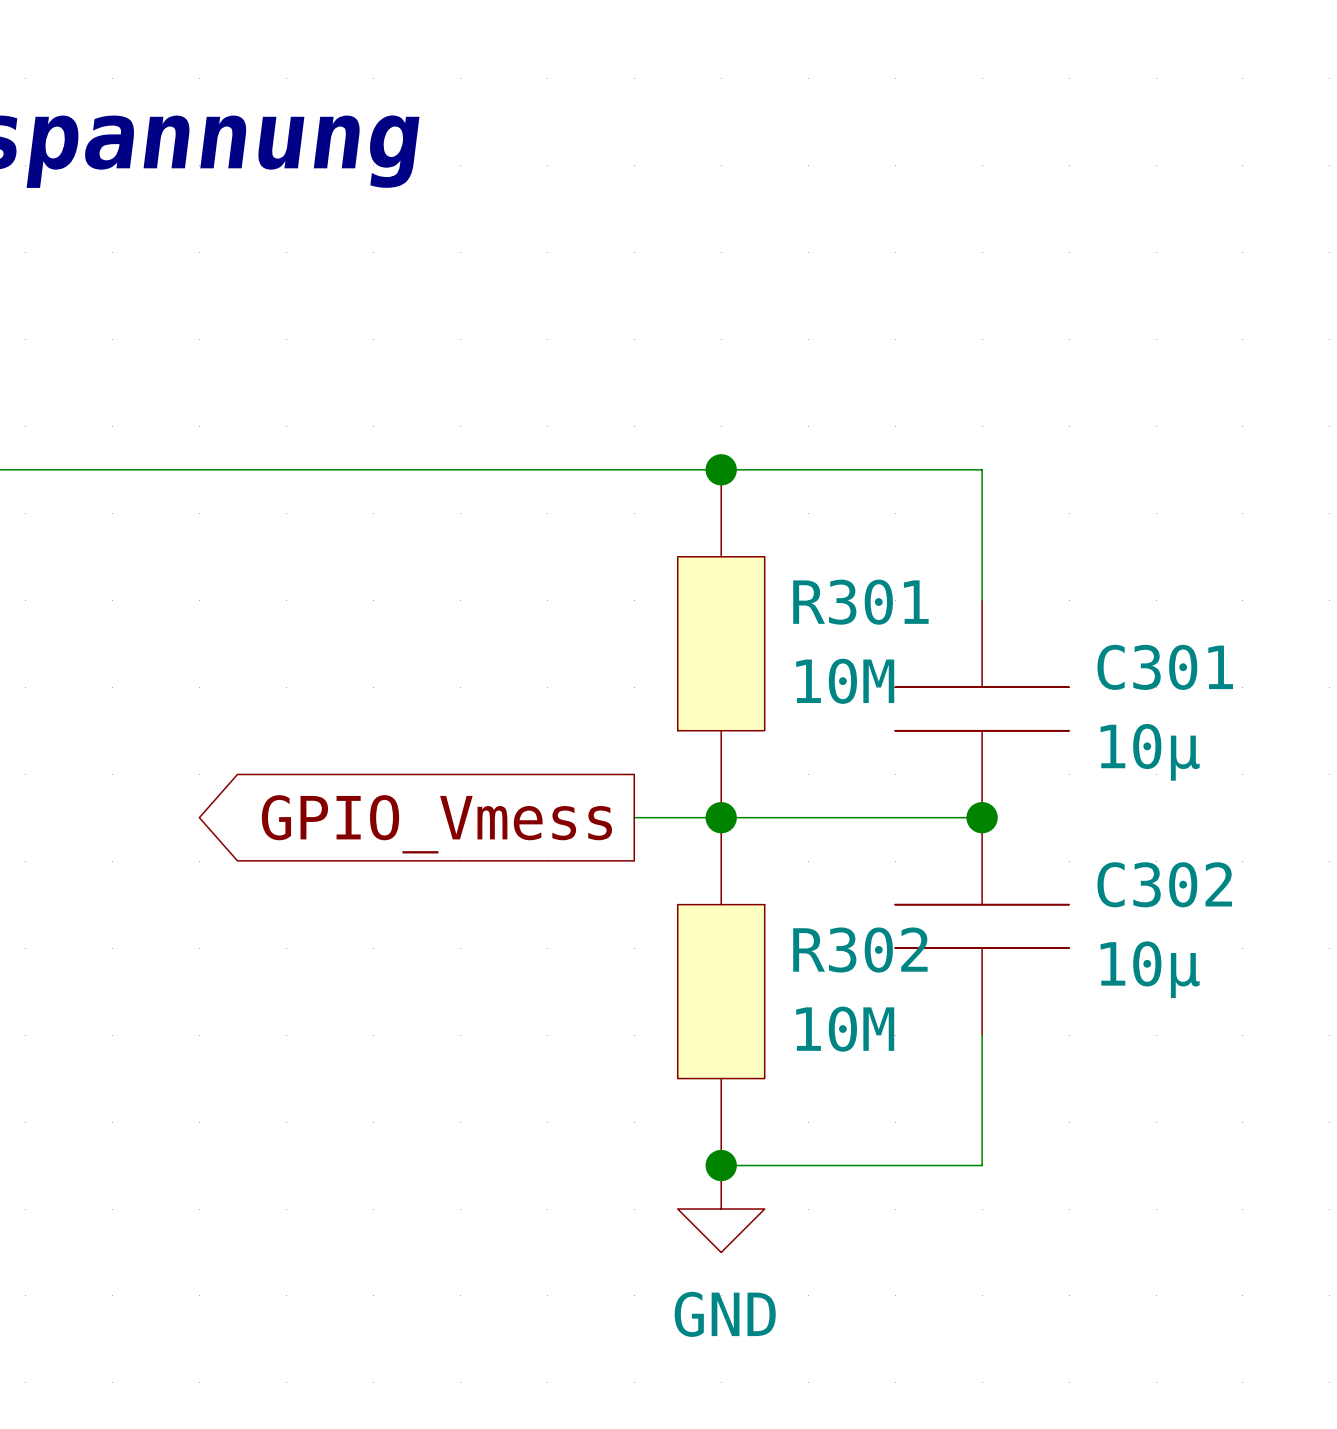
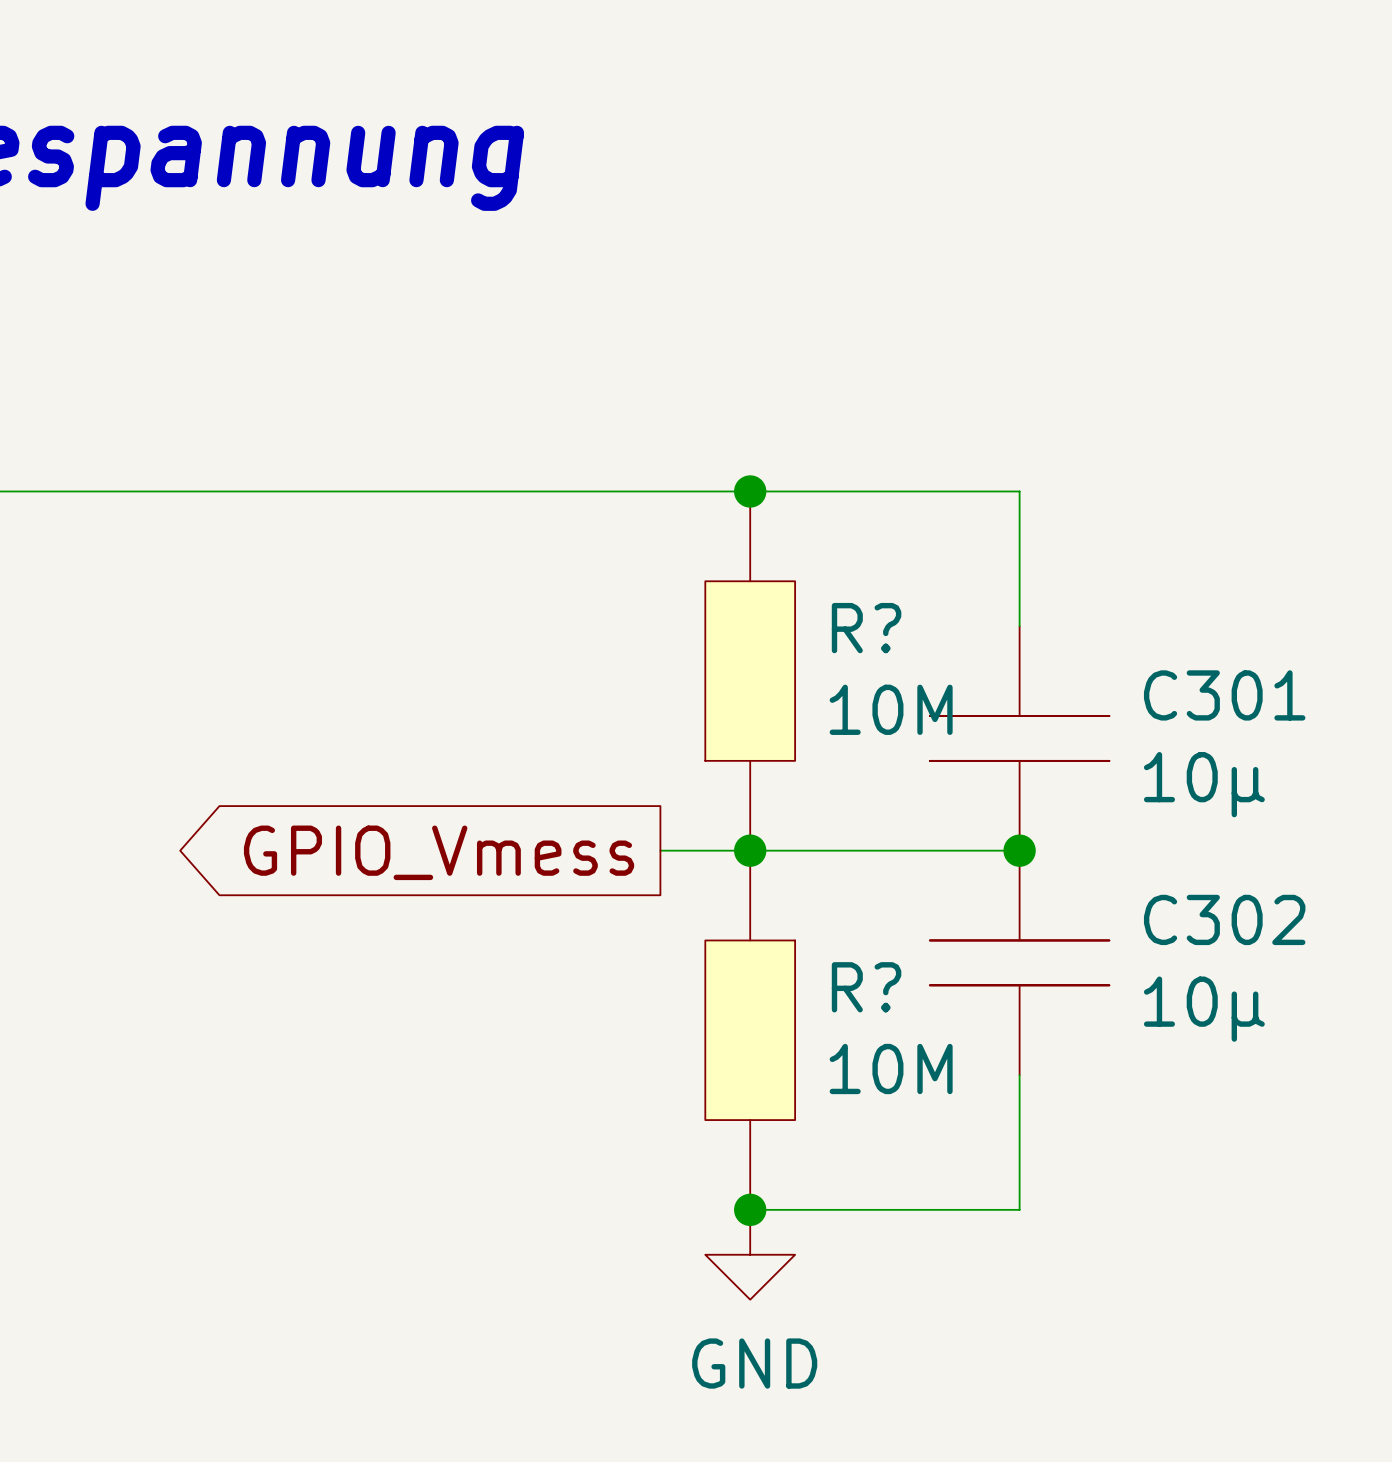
R301 name: R301 (860, 602) -> R? (866, 628)
R302 name: R302 (860, 950) -> R? (866, 987)

